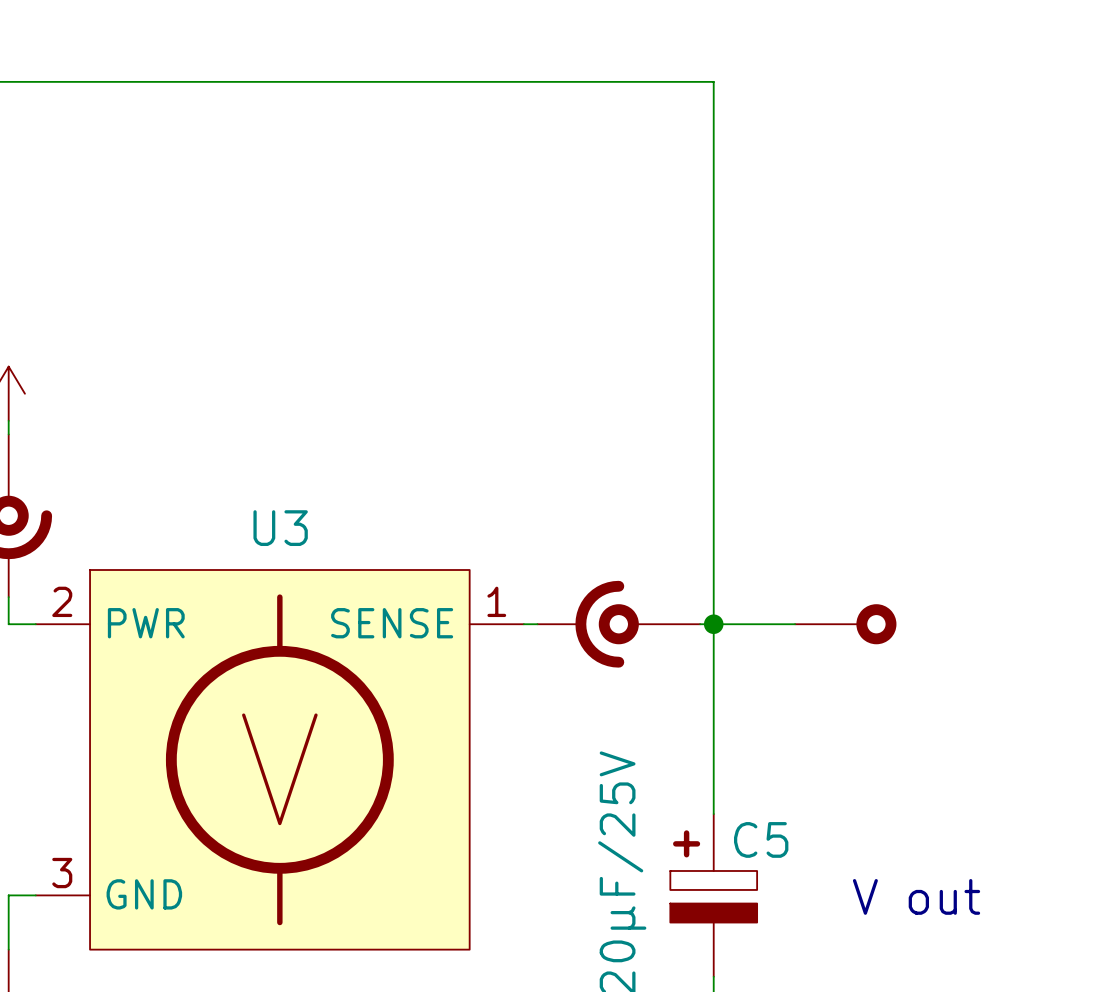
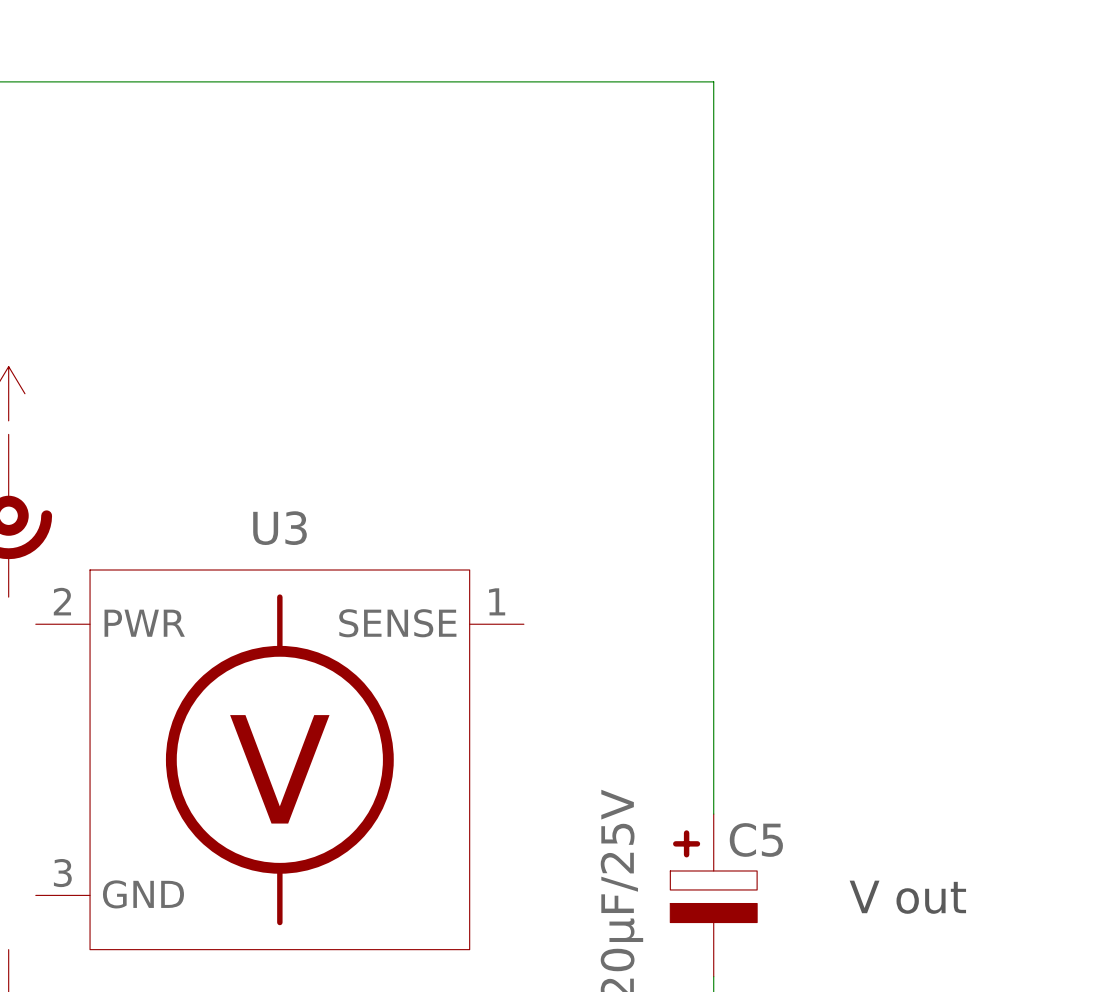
wire: (8, 420) (8, 434) -> none
wire: (8, 597) (8, 624) (35, 624) -> none
wire: (523, 624) (537, 624) -> none
part: (580, 624) -> none
part: (649, 624) -> none
wire: (700, 624) (795, 624) -> none
junction: (713, 624) -> none
part: (845, 624) -> none
wire: (35, 895) (8, 895) (8, 949) -> none

